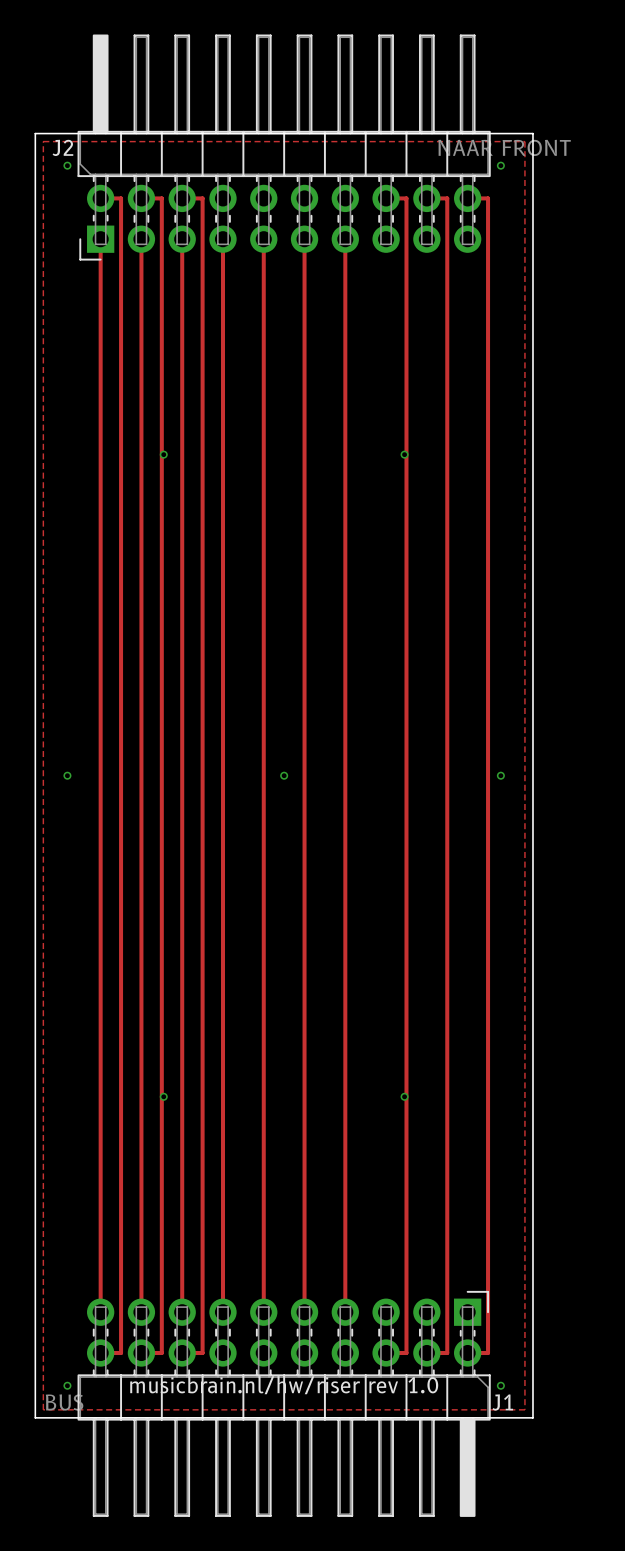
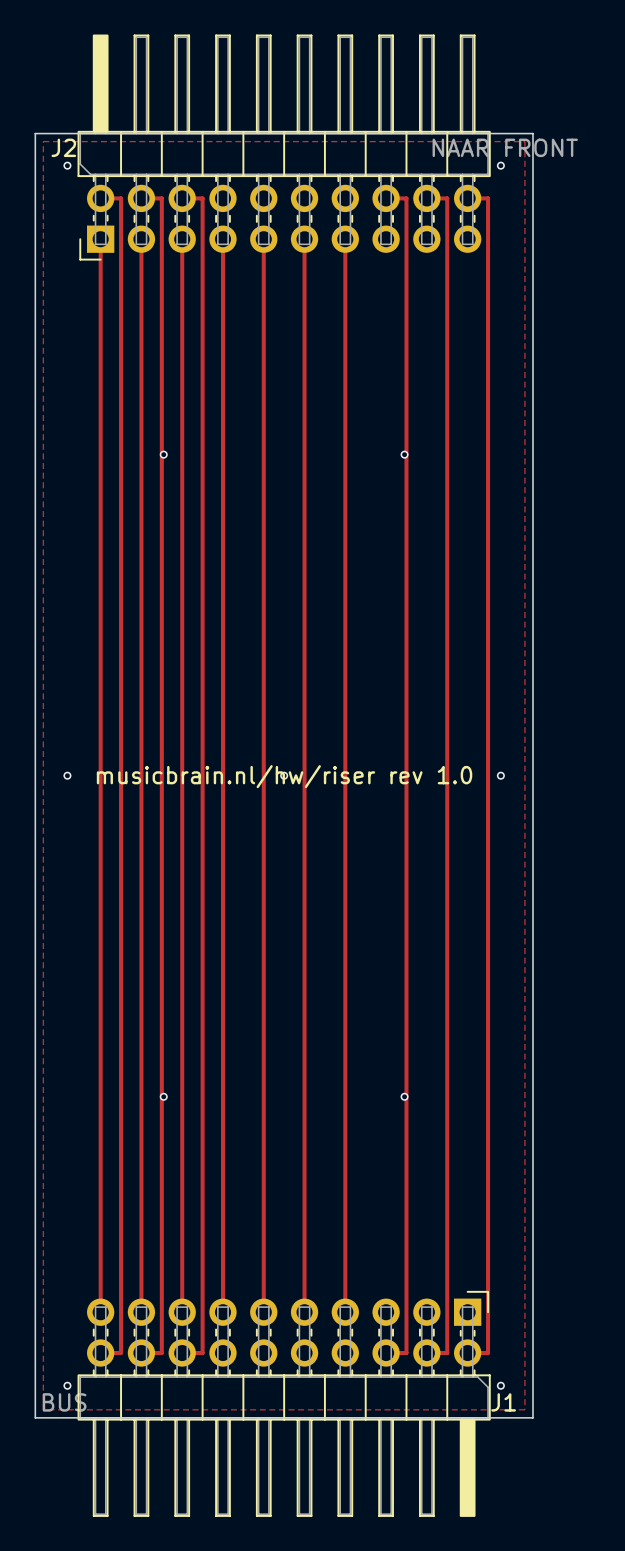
text: none -> musicbrain.nl/hw/riser rev 1.0 (284, 776)
text: musicbrain.nl/hw/riser rev 1.0 (284, 1385) -> none

